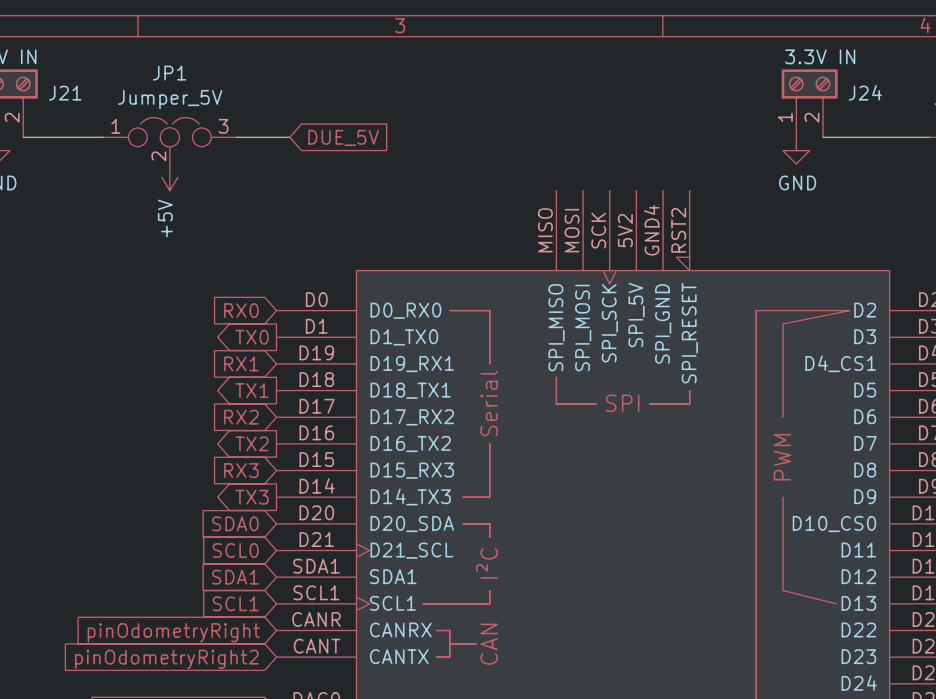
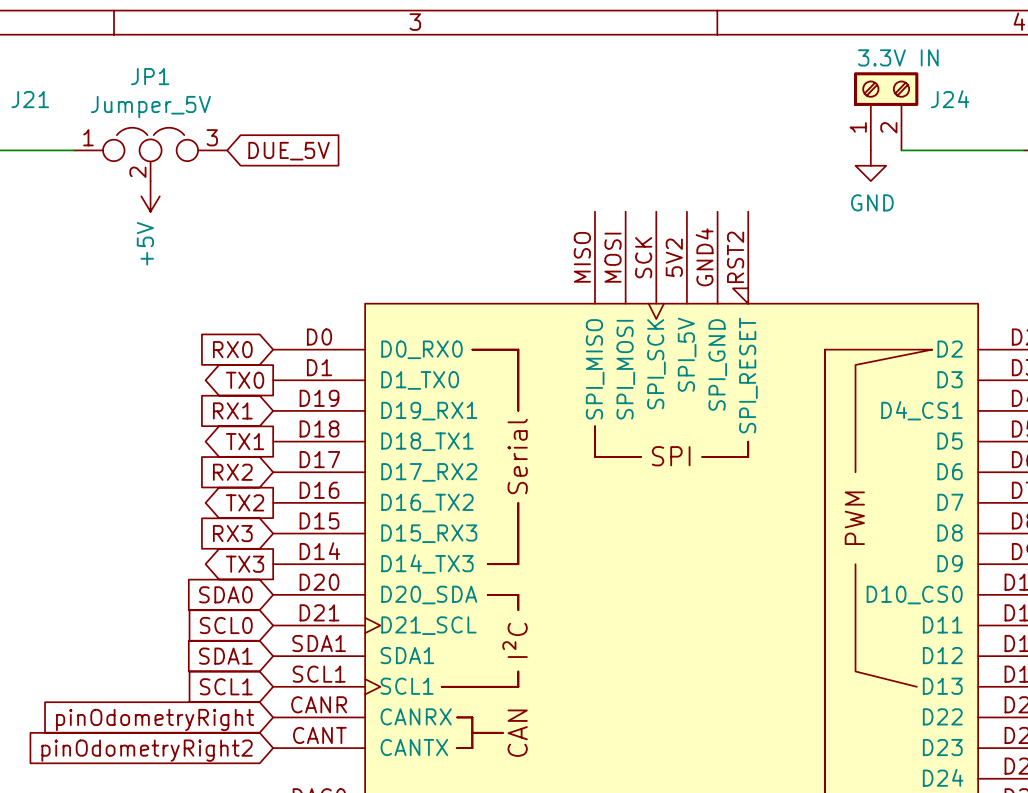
wire: (236, 137) (289, 137) -> none
global label position: DUE_5V (343, 137) -> DUE_5V (289, 151)

